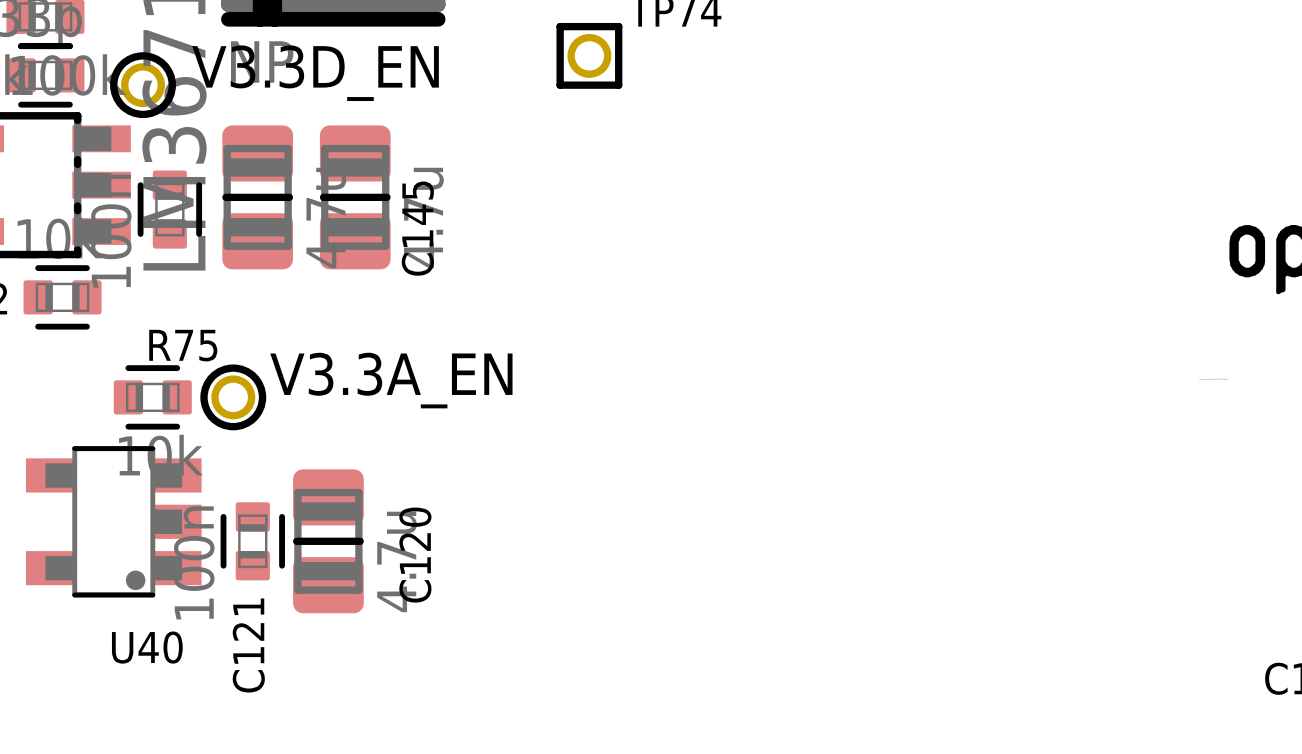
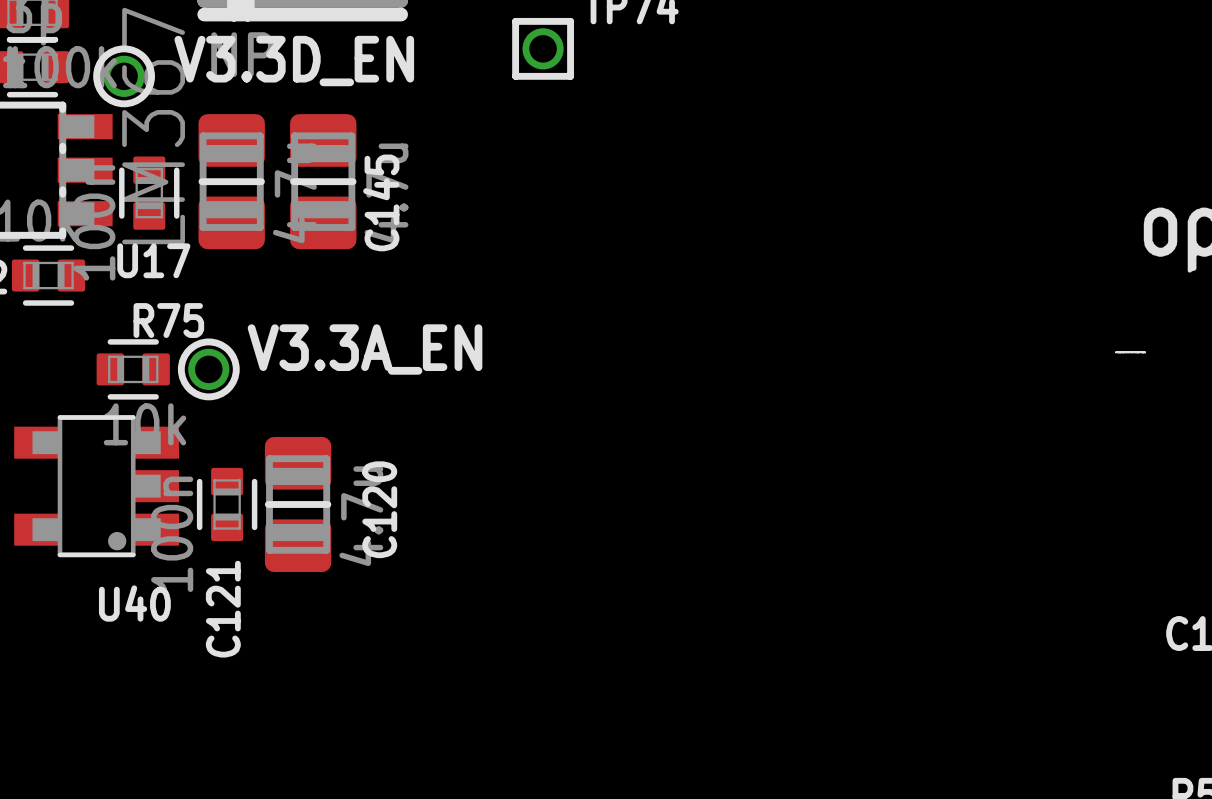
U17 name: none -> U17 (153, 260)

